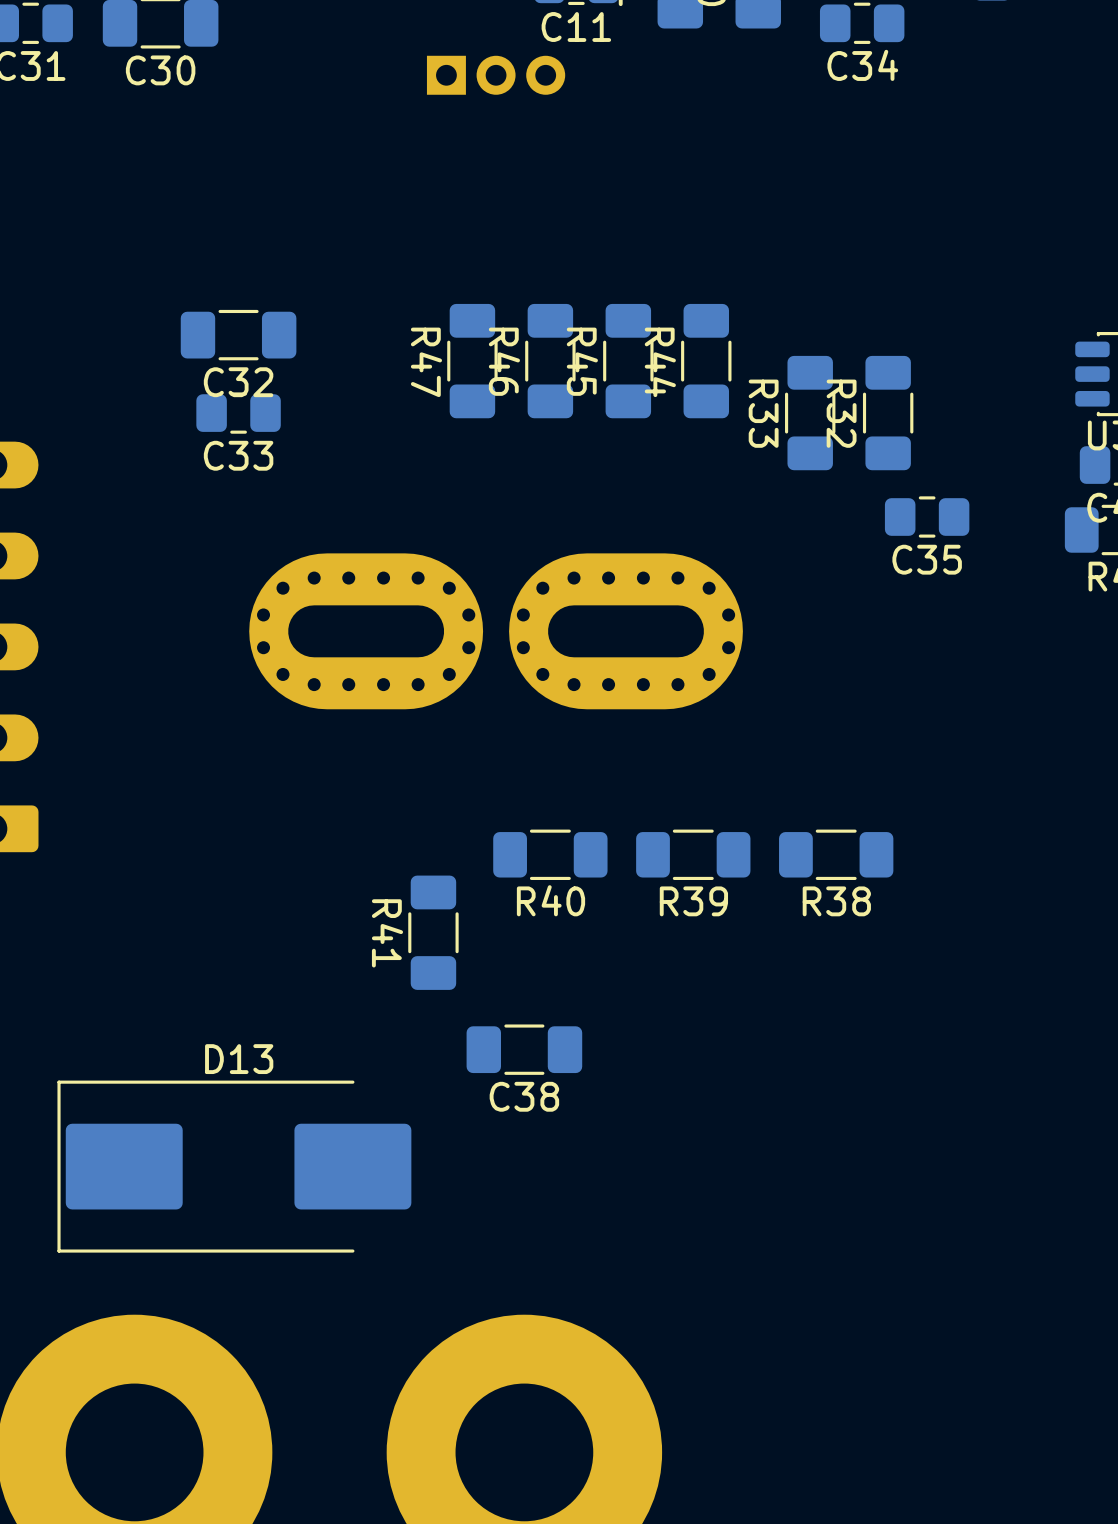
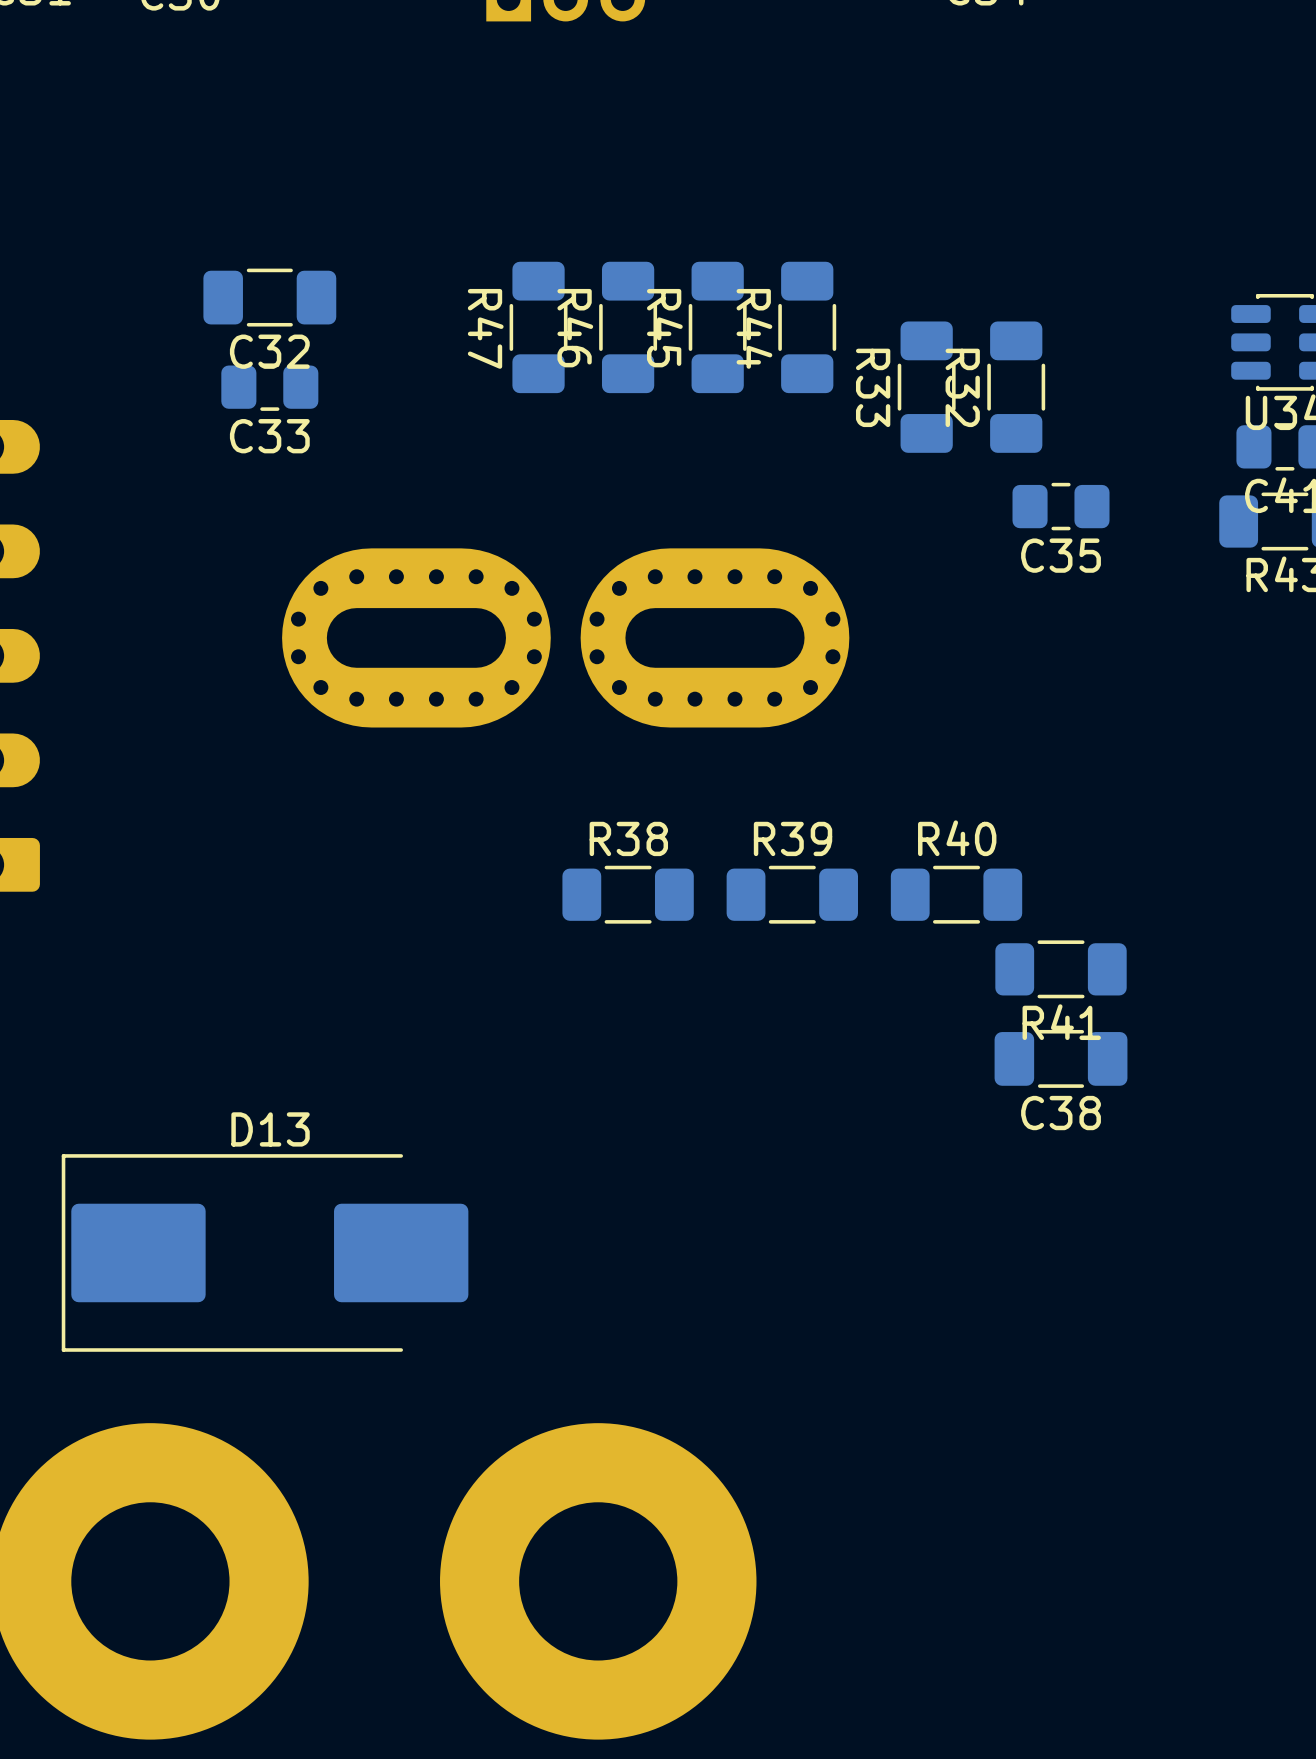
R40 name: R40 (550, 900) -> R38 (628, 838)
R39 name position: R39 (693, 901) -> R39 (793, 838)
R38 name: R38 (836, 901) -> R40 (957, 838)
R41 rotation: 0° (433, 932) -> 90° clockwise (1061, 969)
R41 position: (433, 932) -> (1061, 969)
R41 name position: R41 (387, 933) -> R41 (1061, 1022)
C38 position: (524, 1049) -> (1061, 1058)

